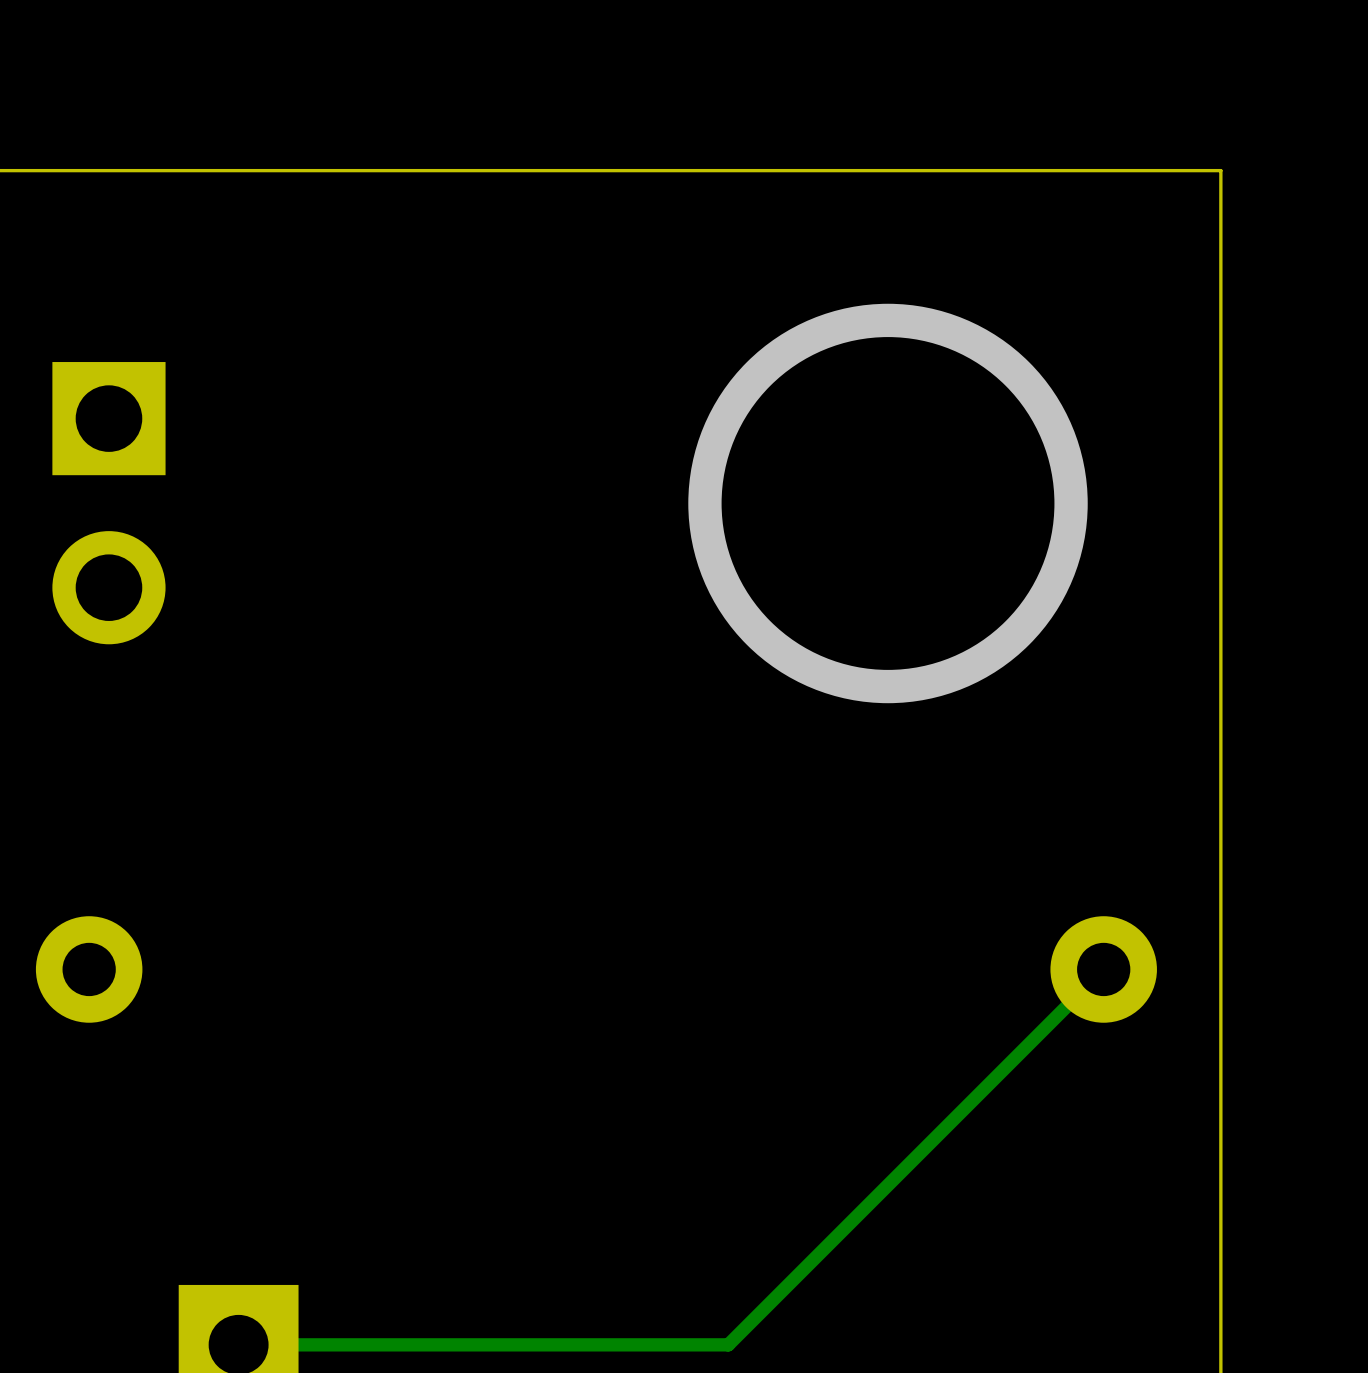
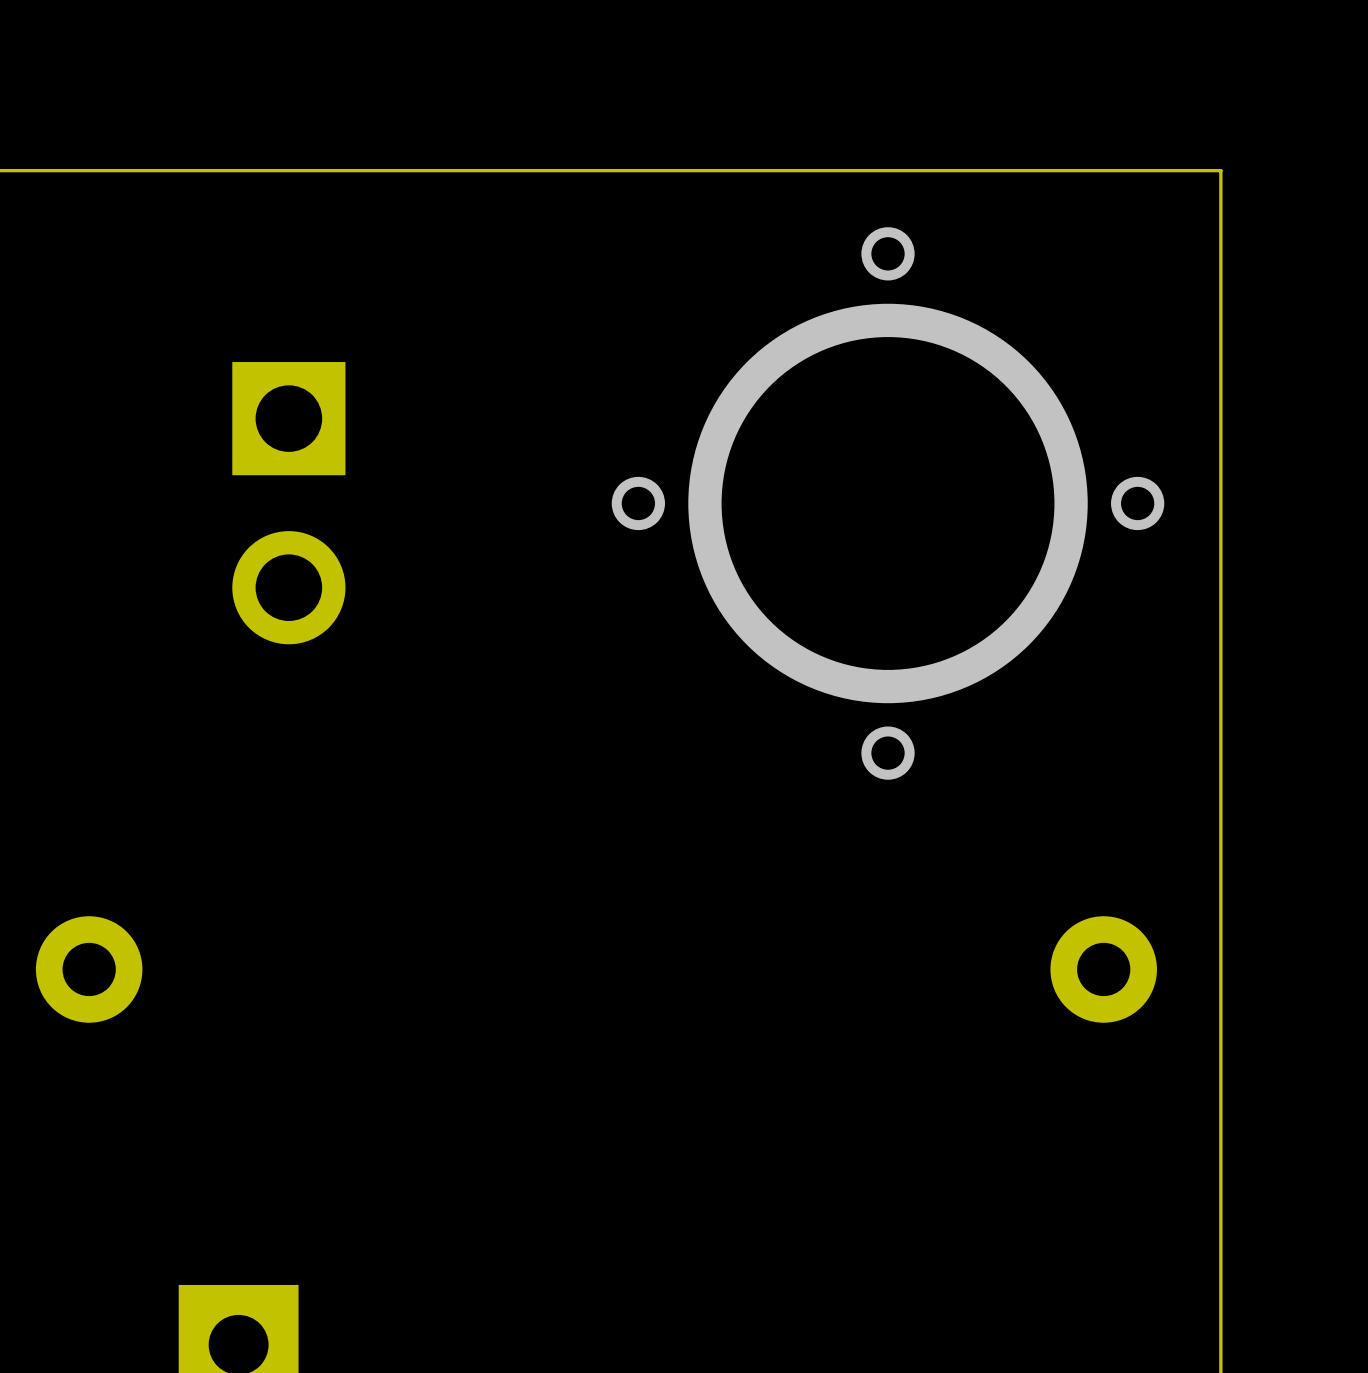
via: none -> (888, 253)
part position: (108, 503) -> (288, 503)
via: none -> (638, 503)
via: none -> (1137, 503)
via: none -> (888, 753)
track: (1103, 969) (728, 1344) (238, 1344) -> none

